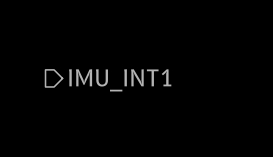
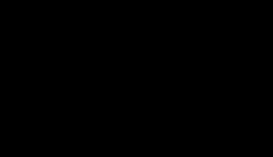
hierarchical label: IMU_INT1 (120, 80) -> none

